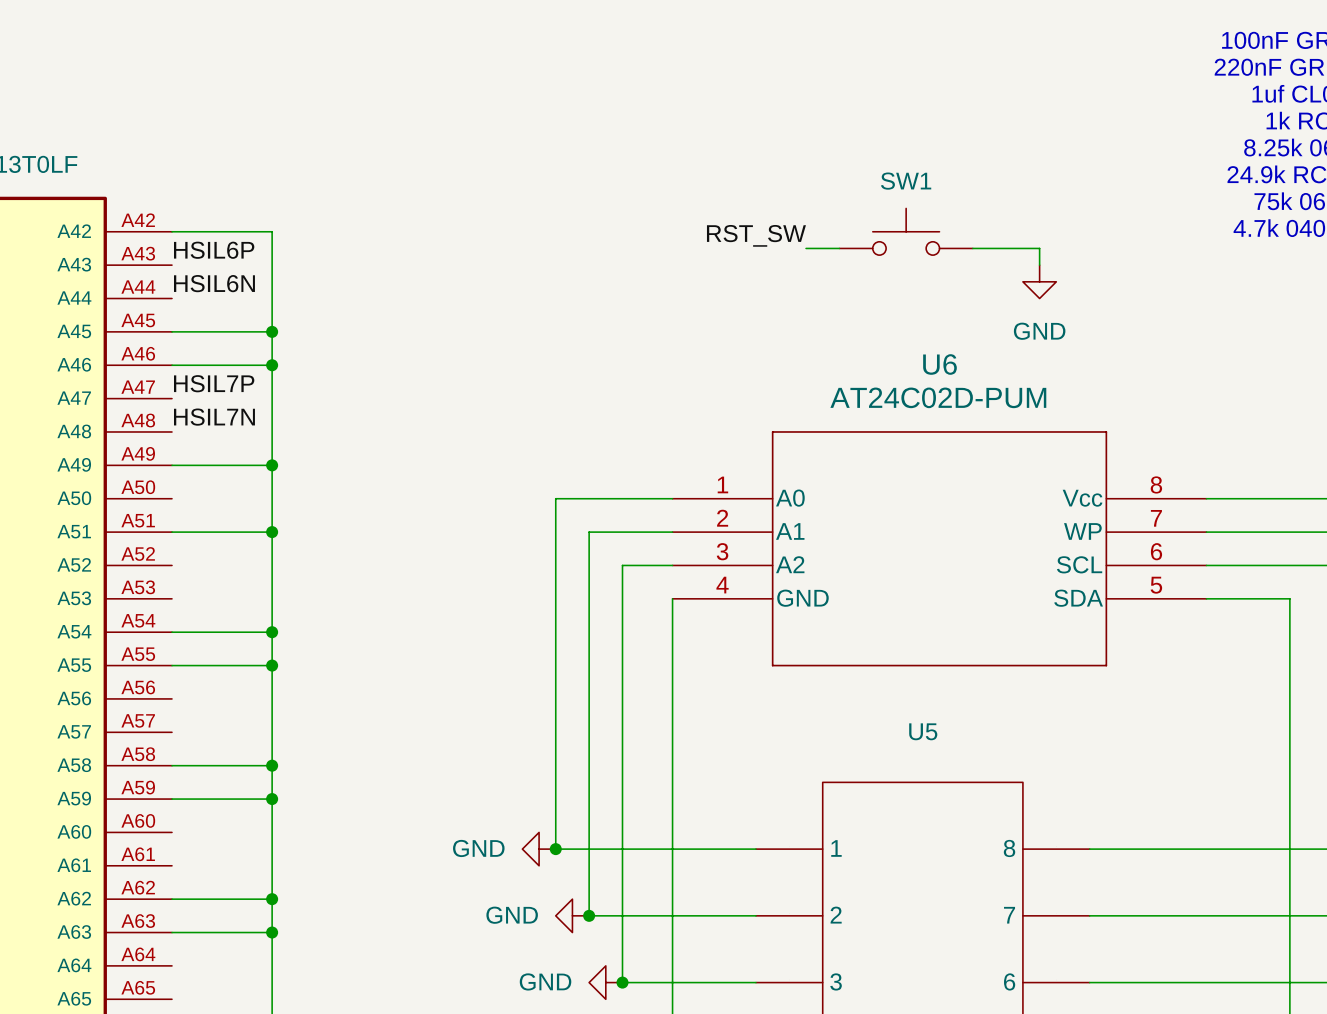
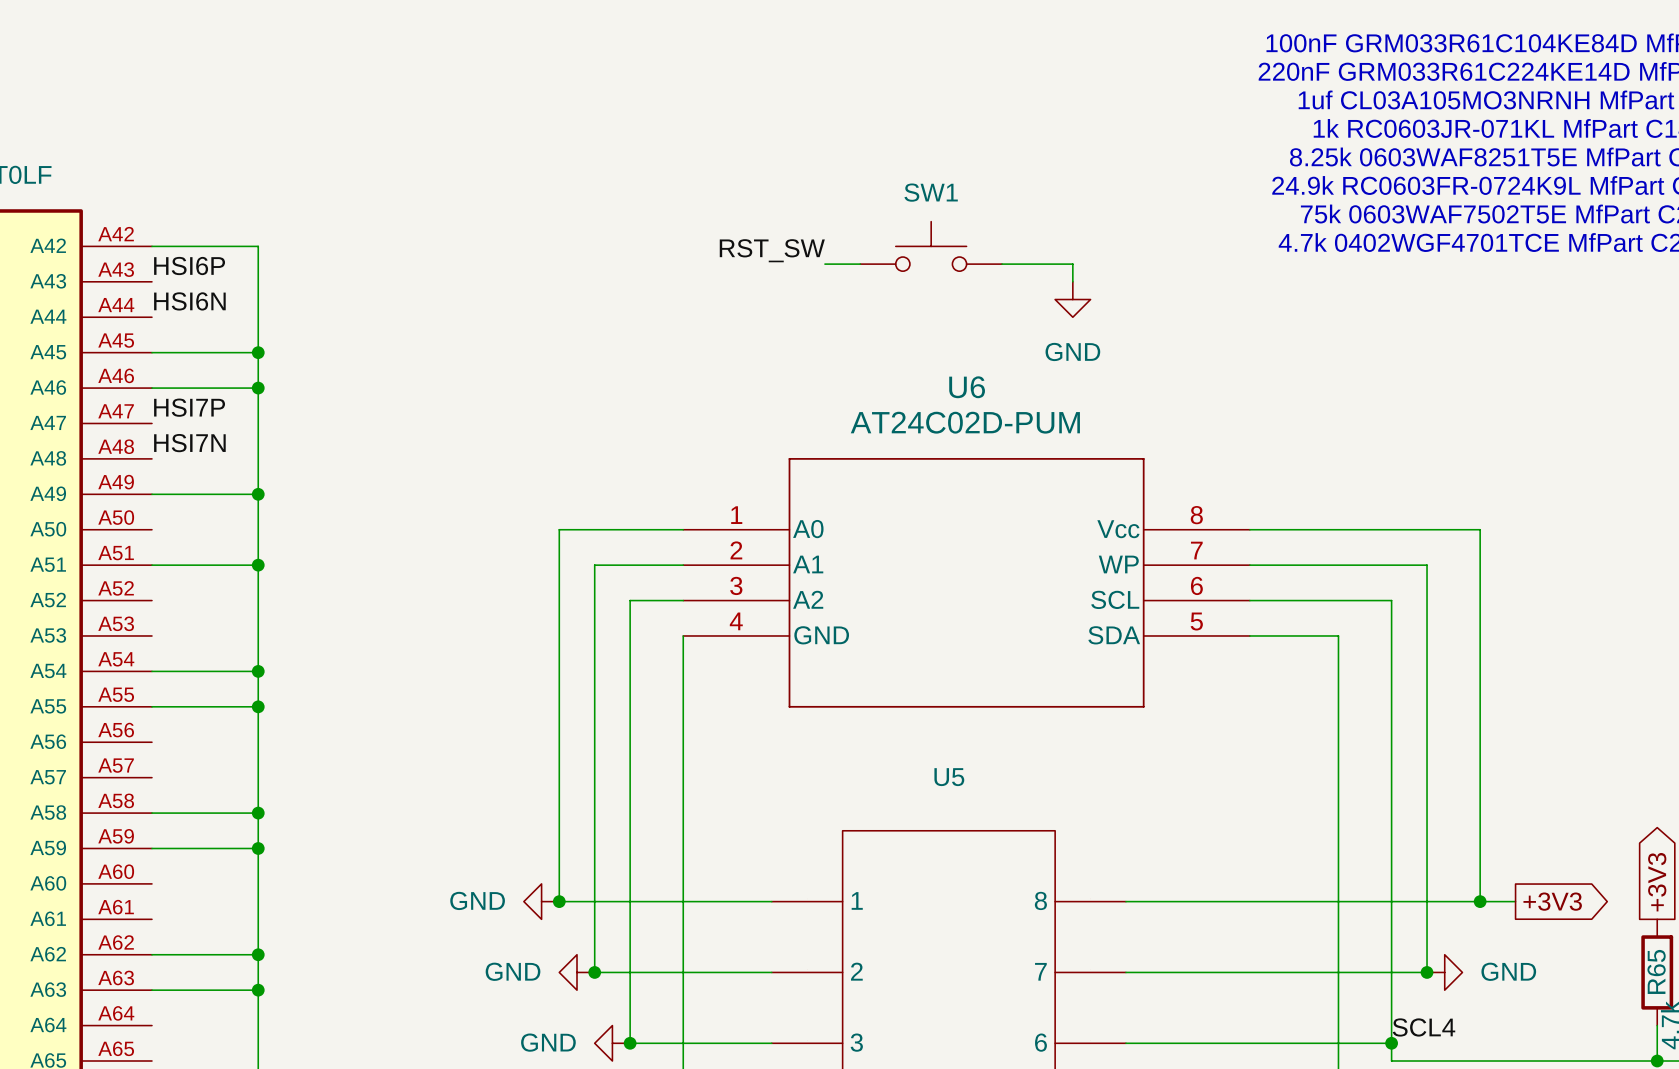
label: HSIL6P (214, 250) -> HSI6P (189, 266)
label: HSIL6N (214, 283) -> HSI6N (189, 301)
label: HSIL7P (214, 383) -> HSI7P (189, 407)
label: HSIL7N (214, 417) -> HSI7N (189, 443)

